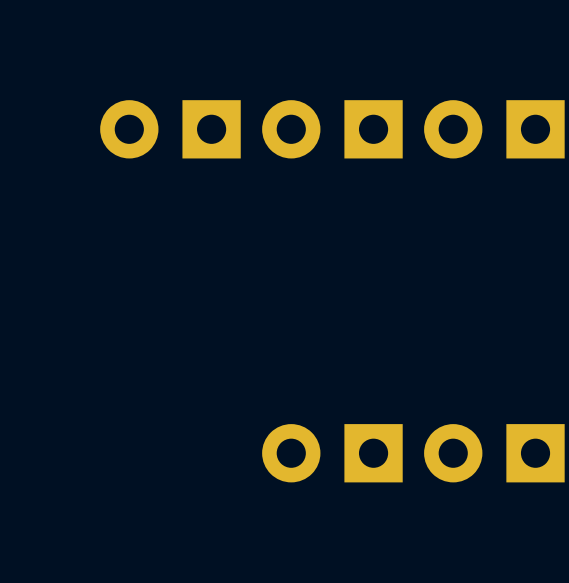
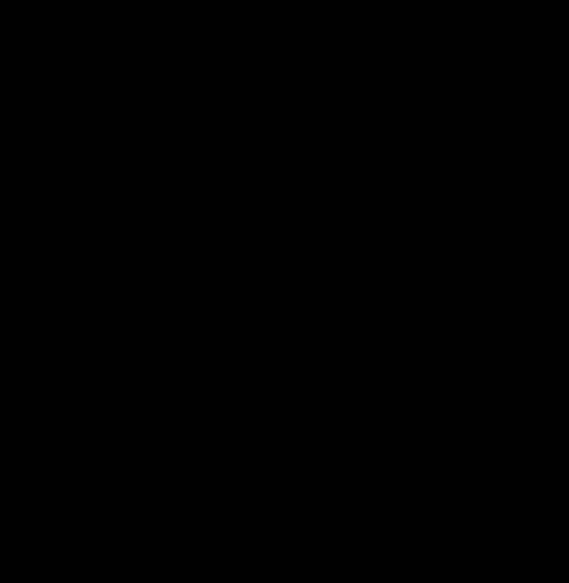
part: (170, 129) -> none
part: (332, 129) -> none
part: (494, 129) -> none
part: (332, 453) -> none
part: (494, 453) -> none

